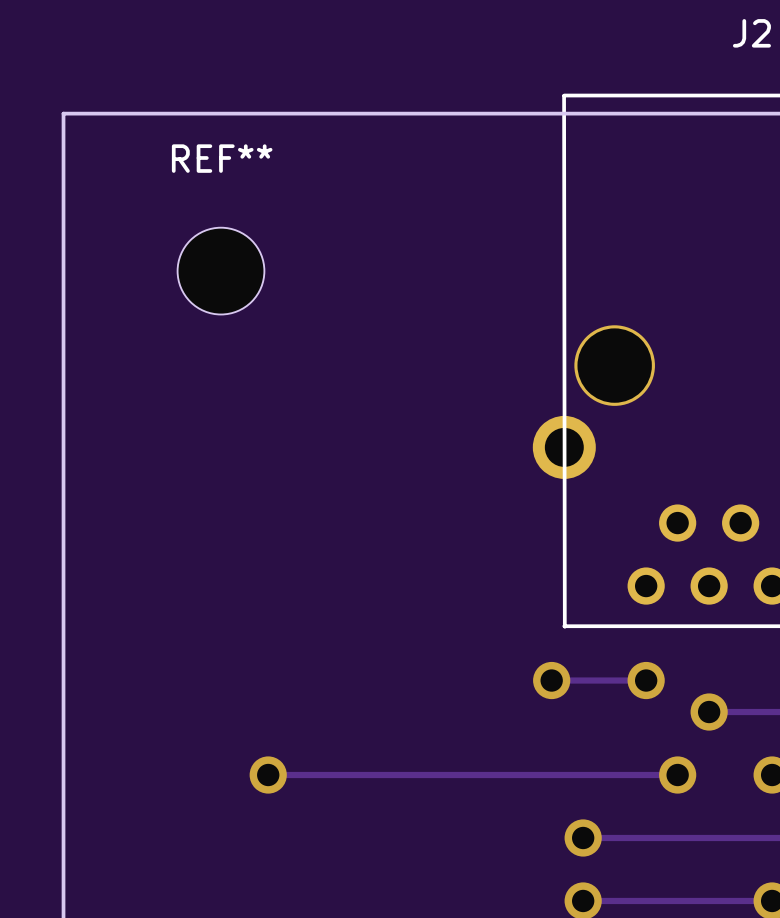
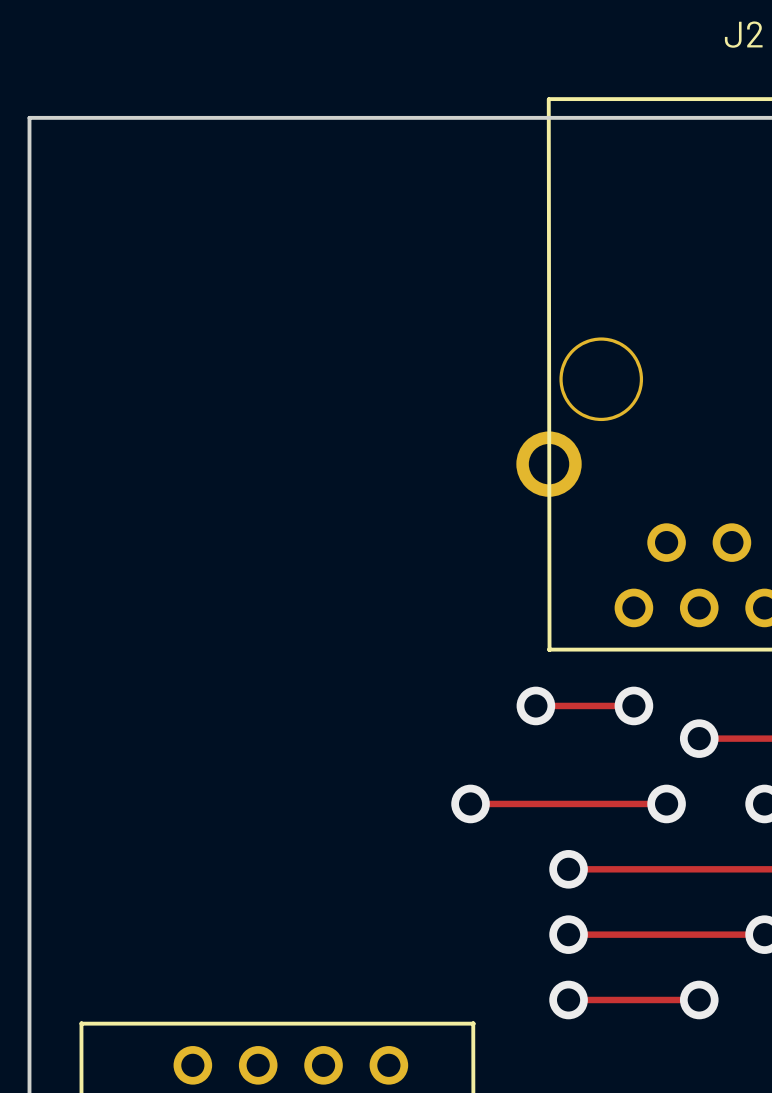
REF**: (220, 271) -> none
track: (268, 775) (488, 775) -> none
via: (268, 775) -> none
via: none -> (470, 803)

